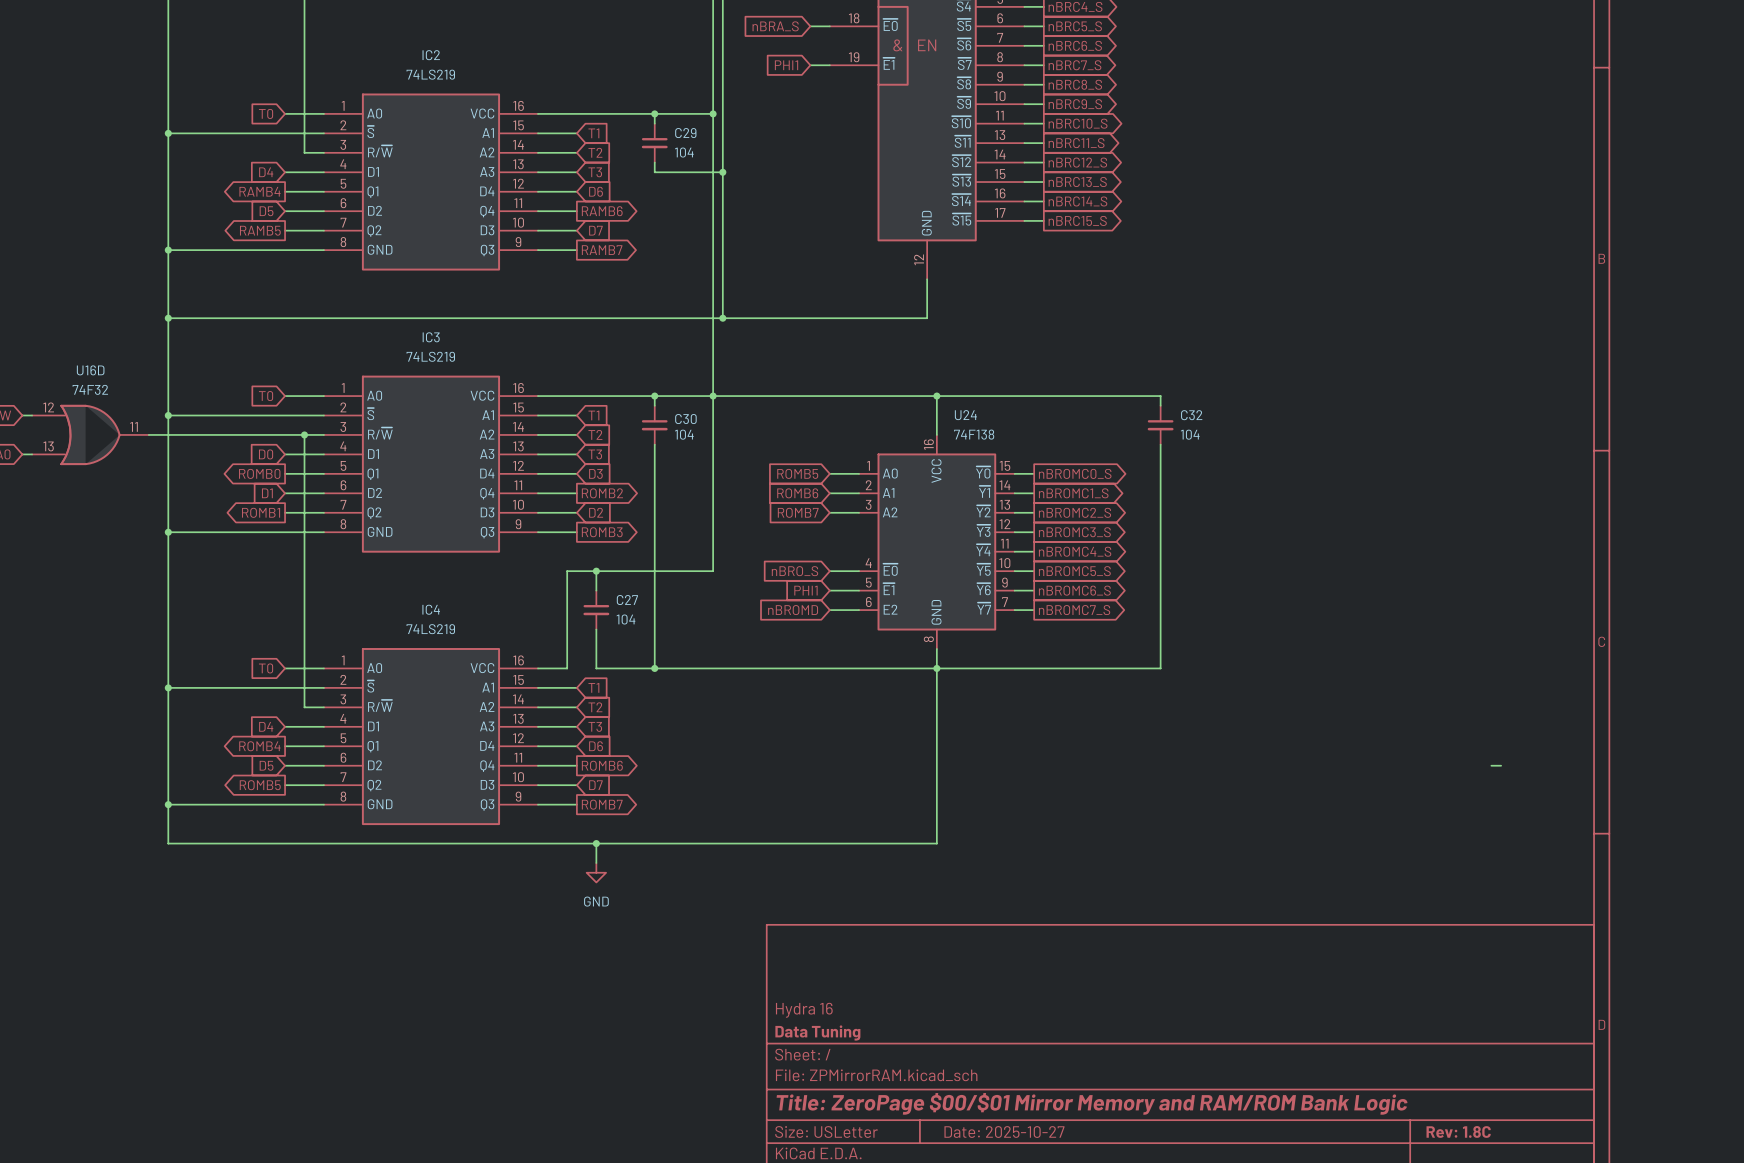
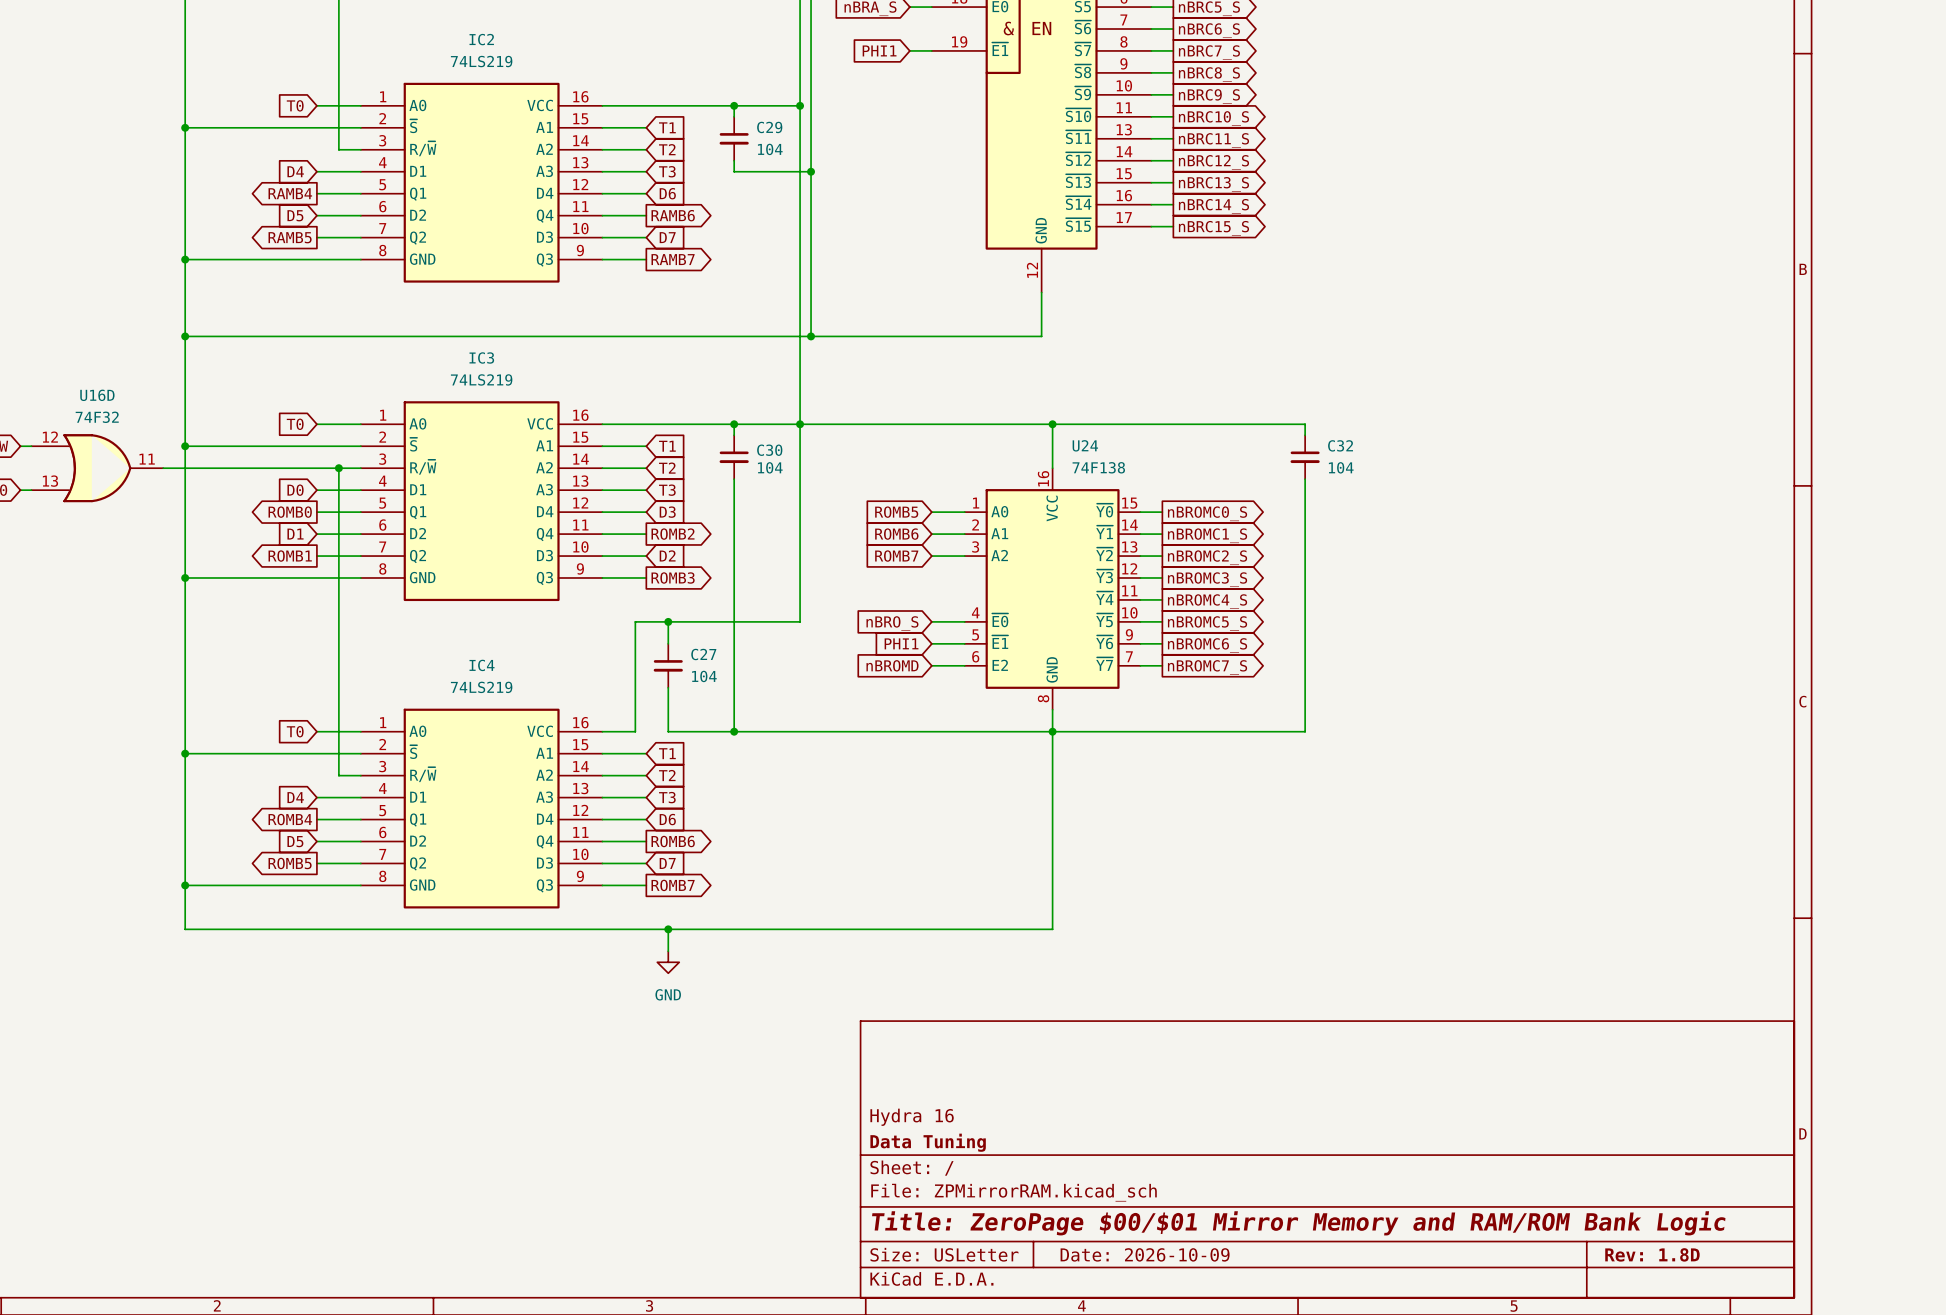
wire: (1491, 765) (1501, 765) -> none
title block: Rev: 1.8C (1458, 1131) -> Rev: 1.8D (1652, 1254)
title block: Date: 2025-10-27 (1004, 1132) -> Date: 2026-10-09 (1145, 1254)

